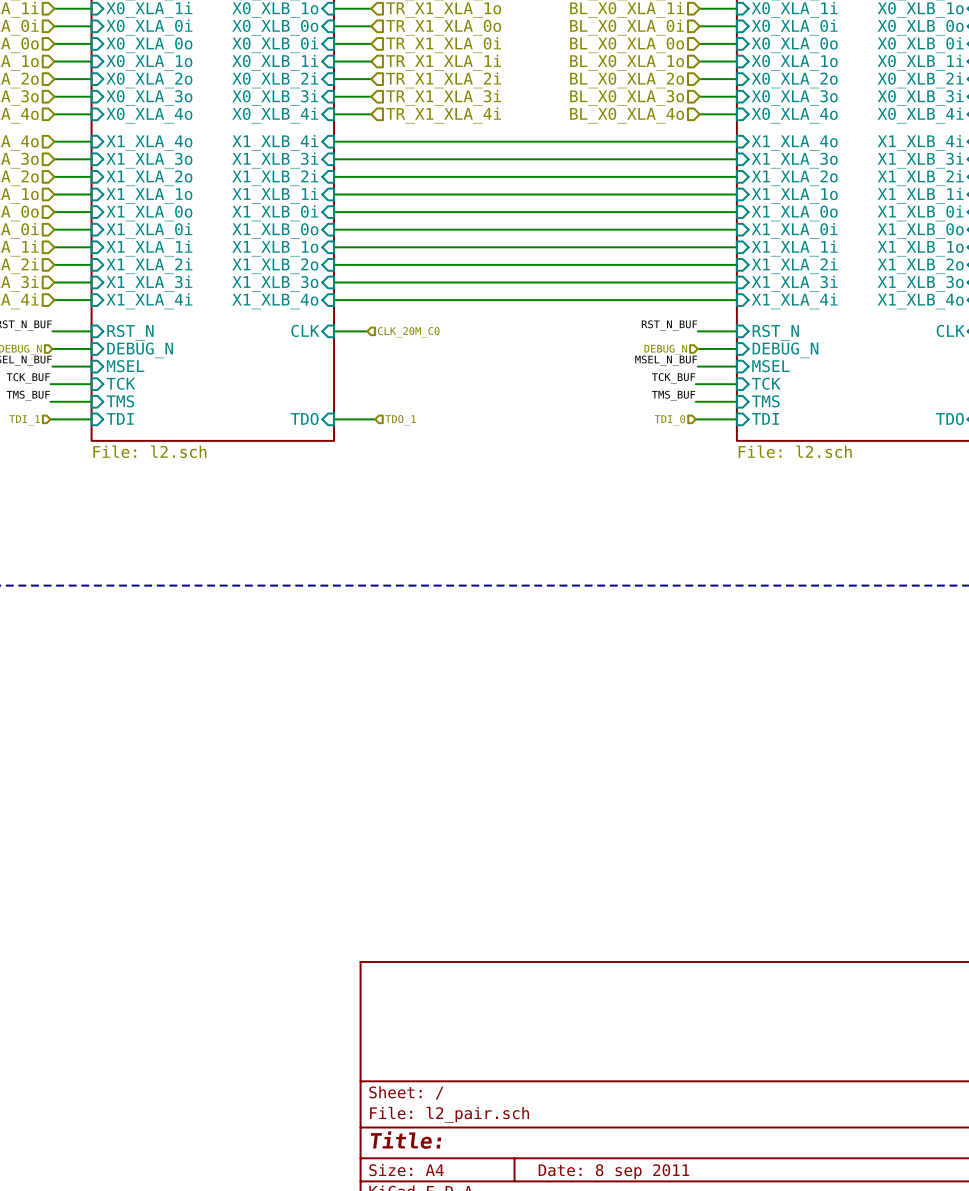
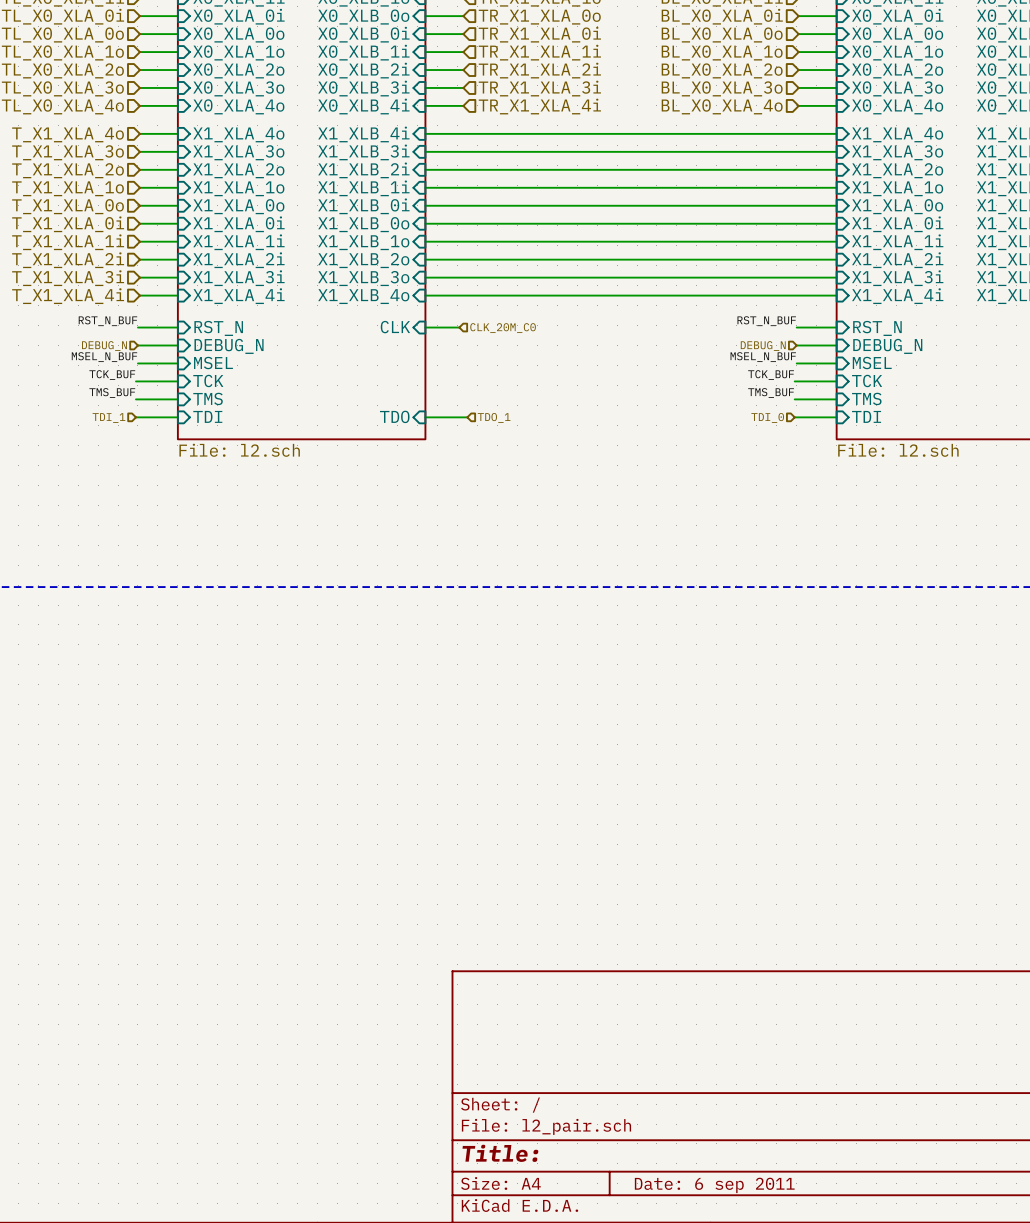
title block: Date: 8 sep 2011 (613, 1171) -> Date: 6 sep 2011 (714, 1185)

